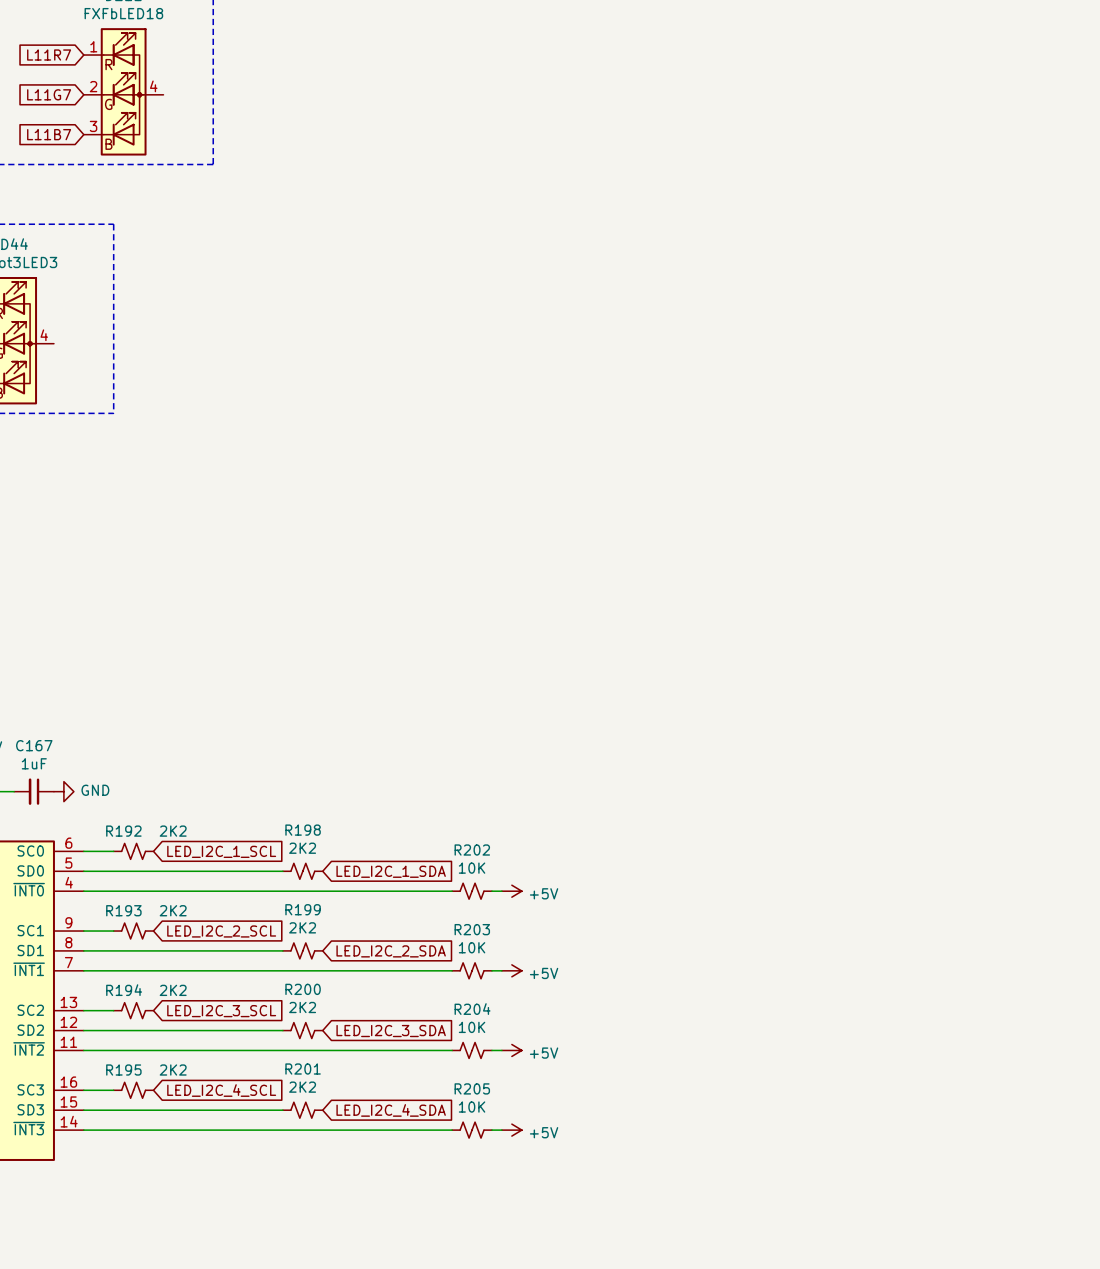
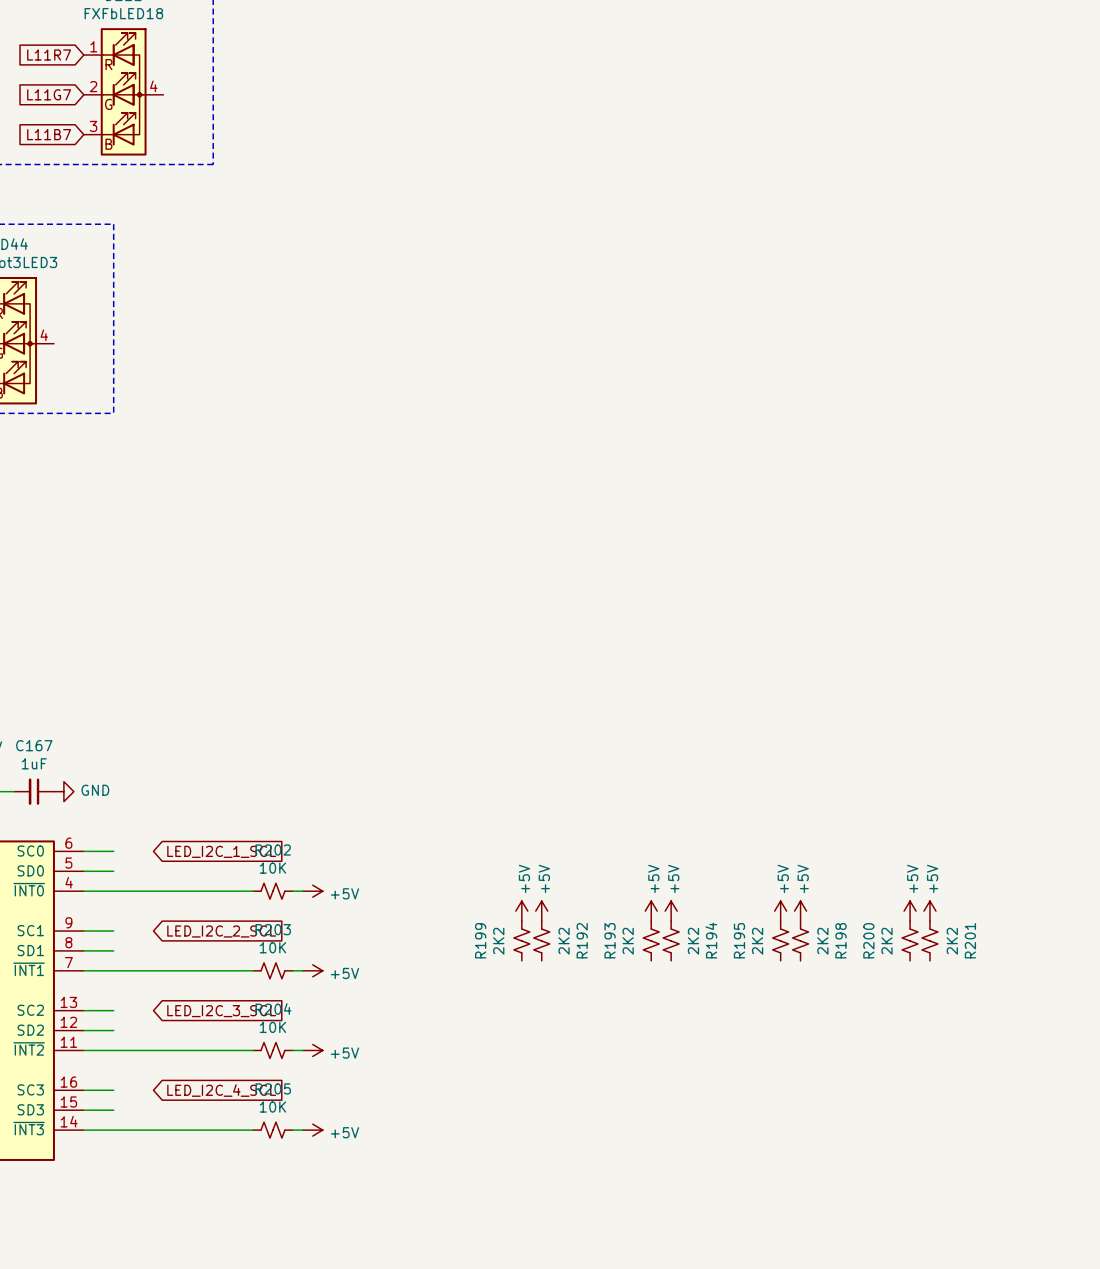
R192 name position: R192 (123, 831) -> R192 (582, 940)
R192 value position: 2K2 (173, 831) -> 2K2 (564, 941)
R192 rotation: 0° (133, 851) -> 90° clockwise (541, 940)
R192 position: (133, 851) -> (541, 940)
wire: (113, 871) (282, 871) -> none
R198 rotation: 0° (302, 871) -> 90° clockwise (800, 940)
R198 position: (302, 871) -> (800, 940)
global label: LED_I2C_1_SDA (391, 871) -> none
wire: (302, 891) (452, 891) -> none
power symbol: none -> +5V (312, 891)
R202 position: (472, 891) -> (272, 891)
wire: (491, 891) (501, 891) -> none
power symbol: +5V (511, 891) -> none
R199 name position: R199 (303, 909) -> R199 (480, 940)
R193 name position: R193 (123, 910) -> R193 (610, 940)
R193 value position: 2K2 (173, 910) -> 2K2 (628, 941)
power symbol: none -> +5V (521, 911)
power symbol: none -> +5V (541, 911)
power symbol: none -> +5V (651, 911)
power symbol: none -> +5V (671, 911)
power symbol: none -> +5V (780, 911)
power symbol: none -> +5V (800, 911)
power symbol: none -> +5V (910, 911)
power symbol: none -> +5V (929, 911)
R199 value position: 2K2 (302, 927) -> 2K2 (498, 941)
R193 rotation: 0° (133, 931) -> 90° clockwise (651, 940)
R193 position: (133, 931) -> (651, 940)
wire: (113, 950) (282, 950) -> none
R199 rotation: 0° (302, 950) -> 90° clockwise (521, 940)
R199 position: (302, 950) -> (521, 940)
global label: LED_I2C_2_SDA (391, 951) -> none
wire: (302, 970) (452, 970) -> none
power symbol: none -> +5V (312, 970)
R203 position: (472, 970) -> (272, 970)
wire: (491, 970) (501, 970) -> none
power symbol: +5V (511, 970) -> none
R200 name position: R200 (303, 989) -> R200 (868, 940)
R194 name position: R194 (124, 990) -> R194 (711, 940)
R194 value position: 2K2 (173, 990) -> 2K2 (693, 941)
R200 value position: 2K2 (302, 1007) -> 2K2 (886, 941)
R194 rotation: 0° (133, 1010) -> 90° clockwise (671, 940)
R194 position: (133, 1010) -> (671, 940)
wire: (113, 1030) (282, 1030) -> none
R200 rotation: 0° (302, 1030) -> 90° clockwise (910, 940)
R200 position: (302, 1030) -> (910, 940)
global label: LED_I2C_3_SDA (391, 1031) -> none
wire: (302, 1050) (452, 1050) -> none
power symbol: none -> +5V (312, 1050)
R204 position: (472, 1050) -> (272, 1050)
wire: (491, 1050) (501, 1050) -> none
power symbol: +5V (511, 1050) -> none
R195 name position: R195 (123, 1070) -> R195 (739, 940)
R195 value position: 2K2 (173, 1070) -> 2K2 (757, 941)
R195 rotation: 0° (133, 1090) -> 90° clockwise (780, 940)
R195 position: (133, 1090) -> (780, 940)
wire: (113, 1110) (282, 1110) -> none
R201 rotation: 0° (302, 1110) -> 90° clockwise (929, 940)
R201 position: (302, 1110) -> (929, 940)
global label: LED_I2C_4_SDA (391, 1110) -> none
wire: (302, 1130) (452, 1130) -> none
power symbol: none -> +5V (312, 1130)
R205 position: (472, 1130) -> (272, 1130)
wire: (491, 1130) (501, 1130) -> none
power symbol: +5V (511, 1130) -> none

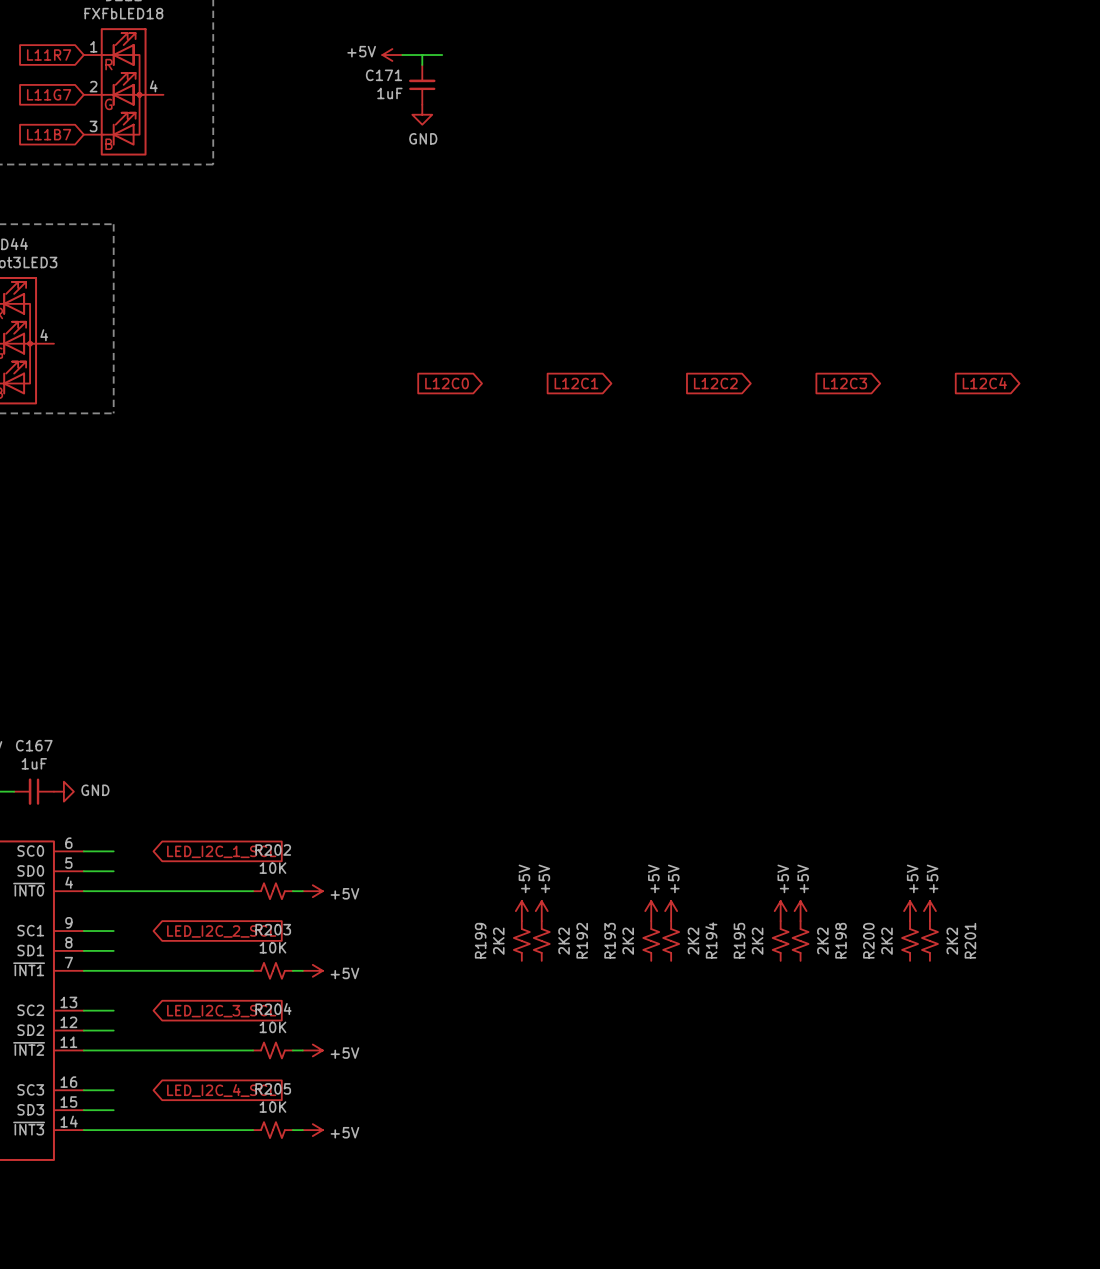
power symbol: none -> +5V (392, 55)
wire: none -> (402, 55) (442, 55)
wire: none -> (422, 55) (422, 64)
C171: none -> 1uF (422, 84)
power symbol: none -> GND (422, 114)
global label: none -> L12C0 (447, 383)
global label: none -> L12C1 (576, 383)
global label: none -> L12C2 (715, 383)
global label: none -> L12C3 (845, 383)
global label: none -> L12C4 (984, 383)

